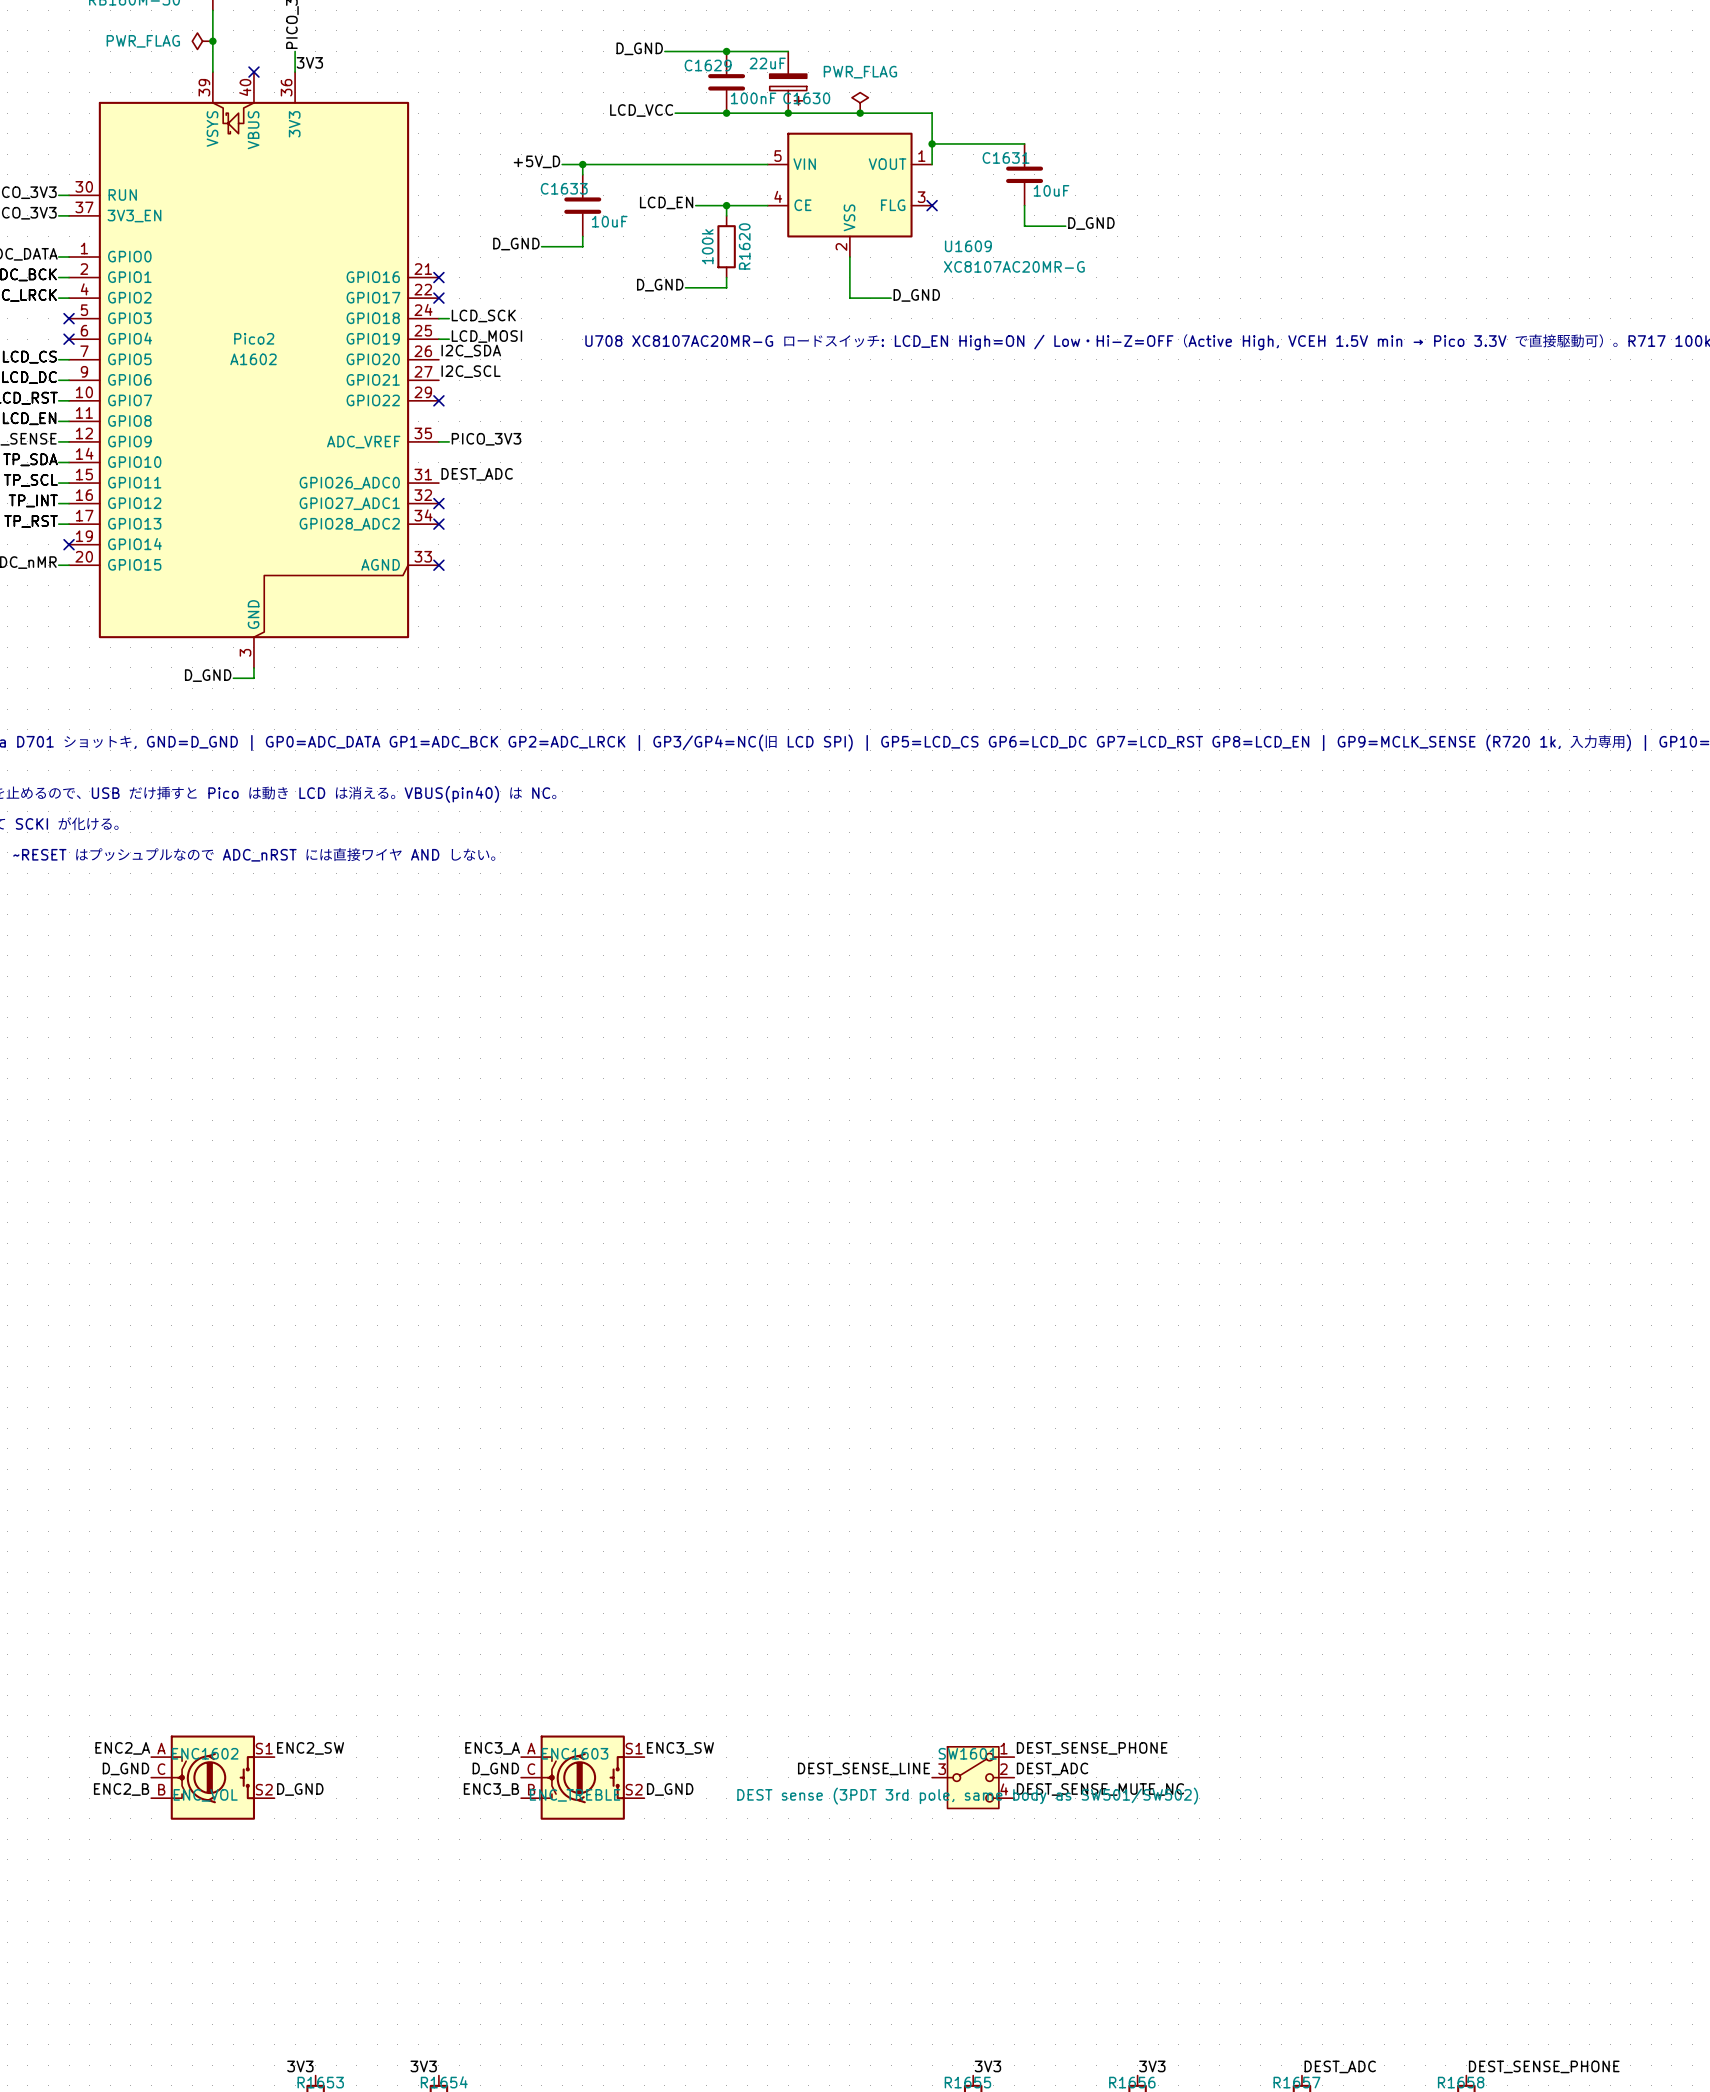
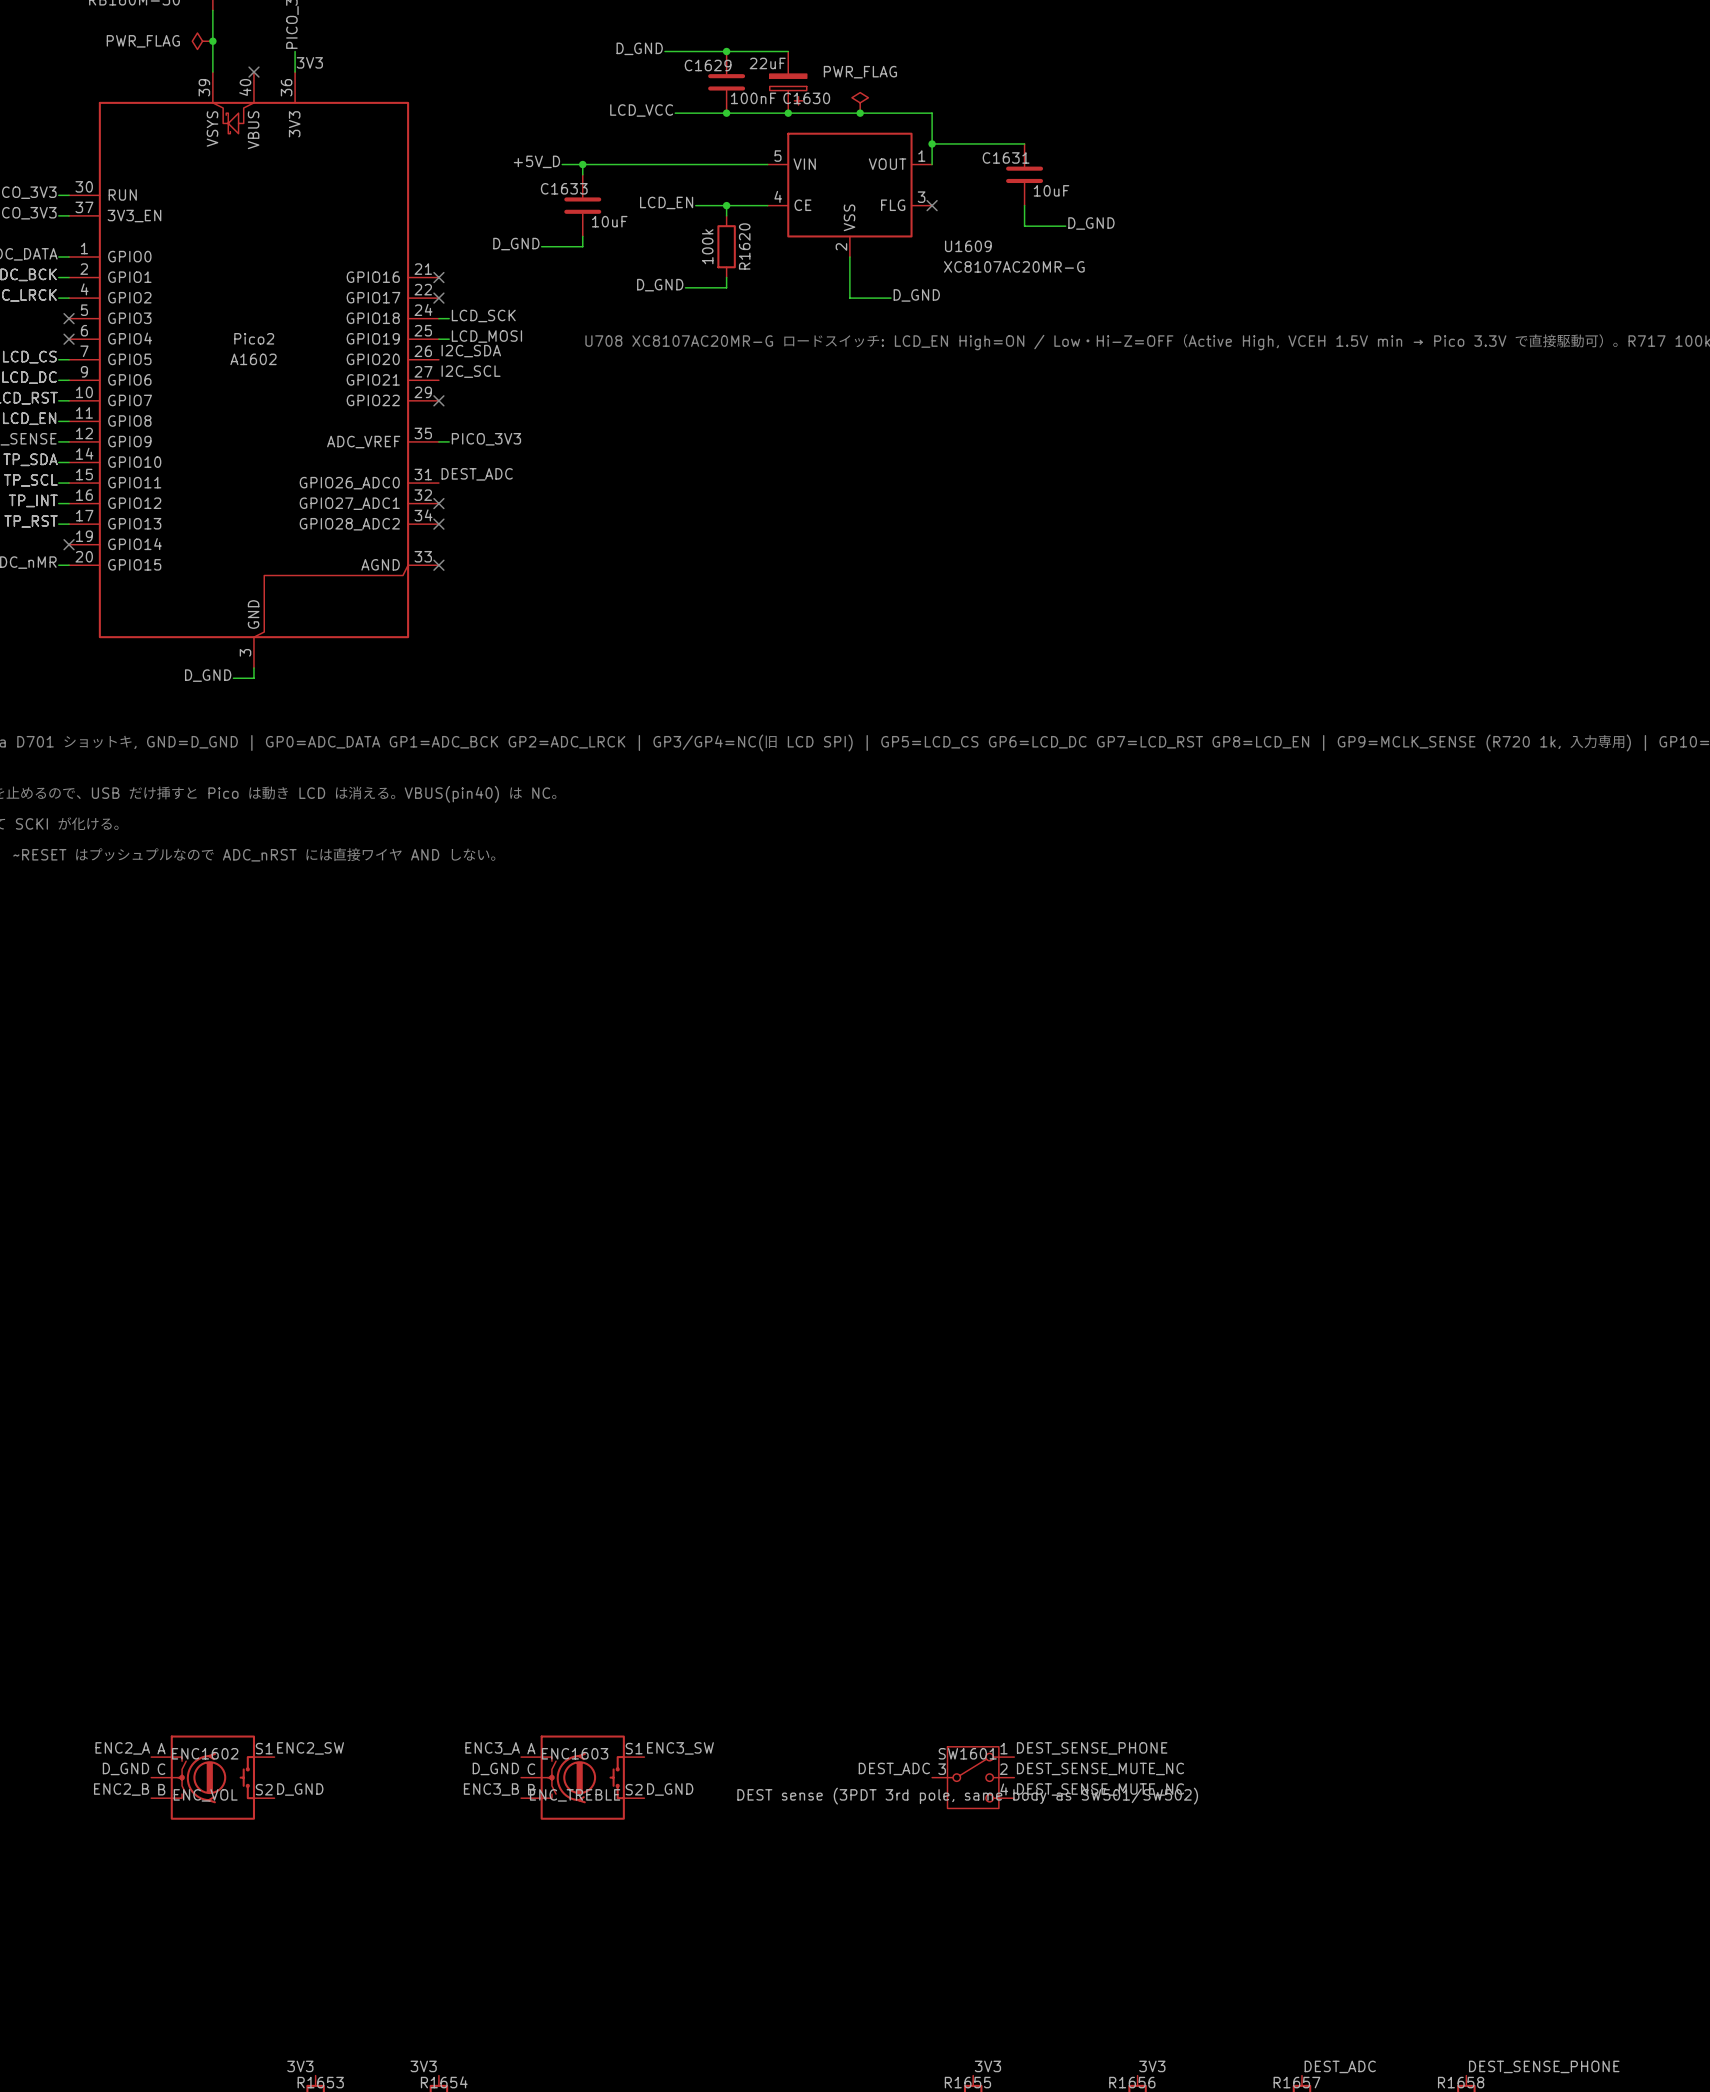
label: DEST_SENSE_LINE (864, 1768) -> DEST_ADC (894, 1768)
label: DEST_ADC (1052, 1768) -> DEST_SENSE_MUTE_NC (1100, 1768)

